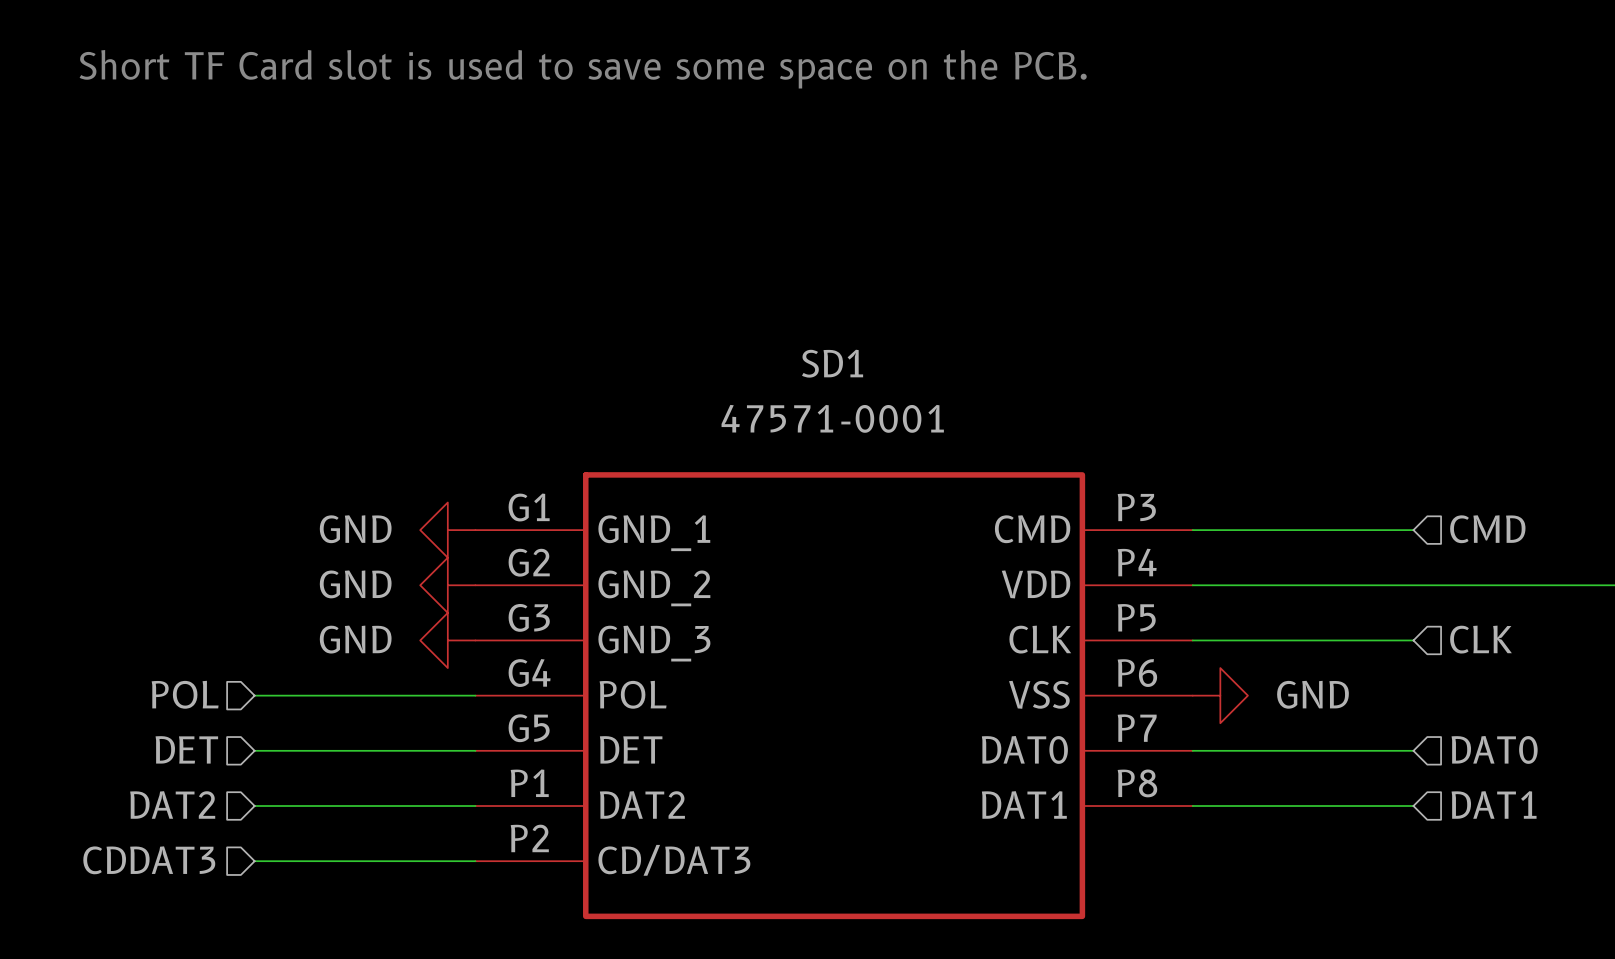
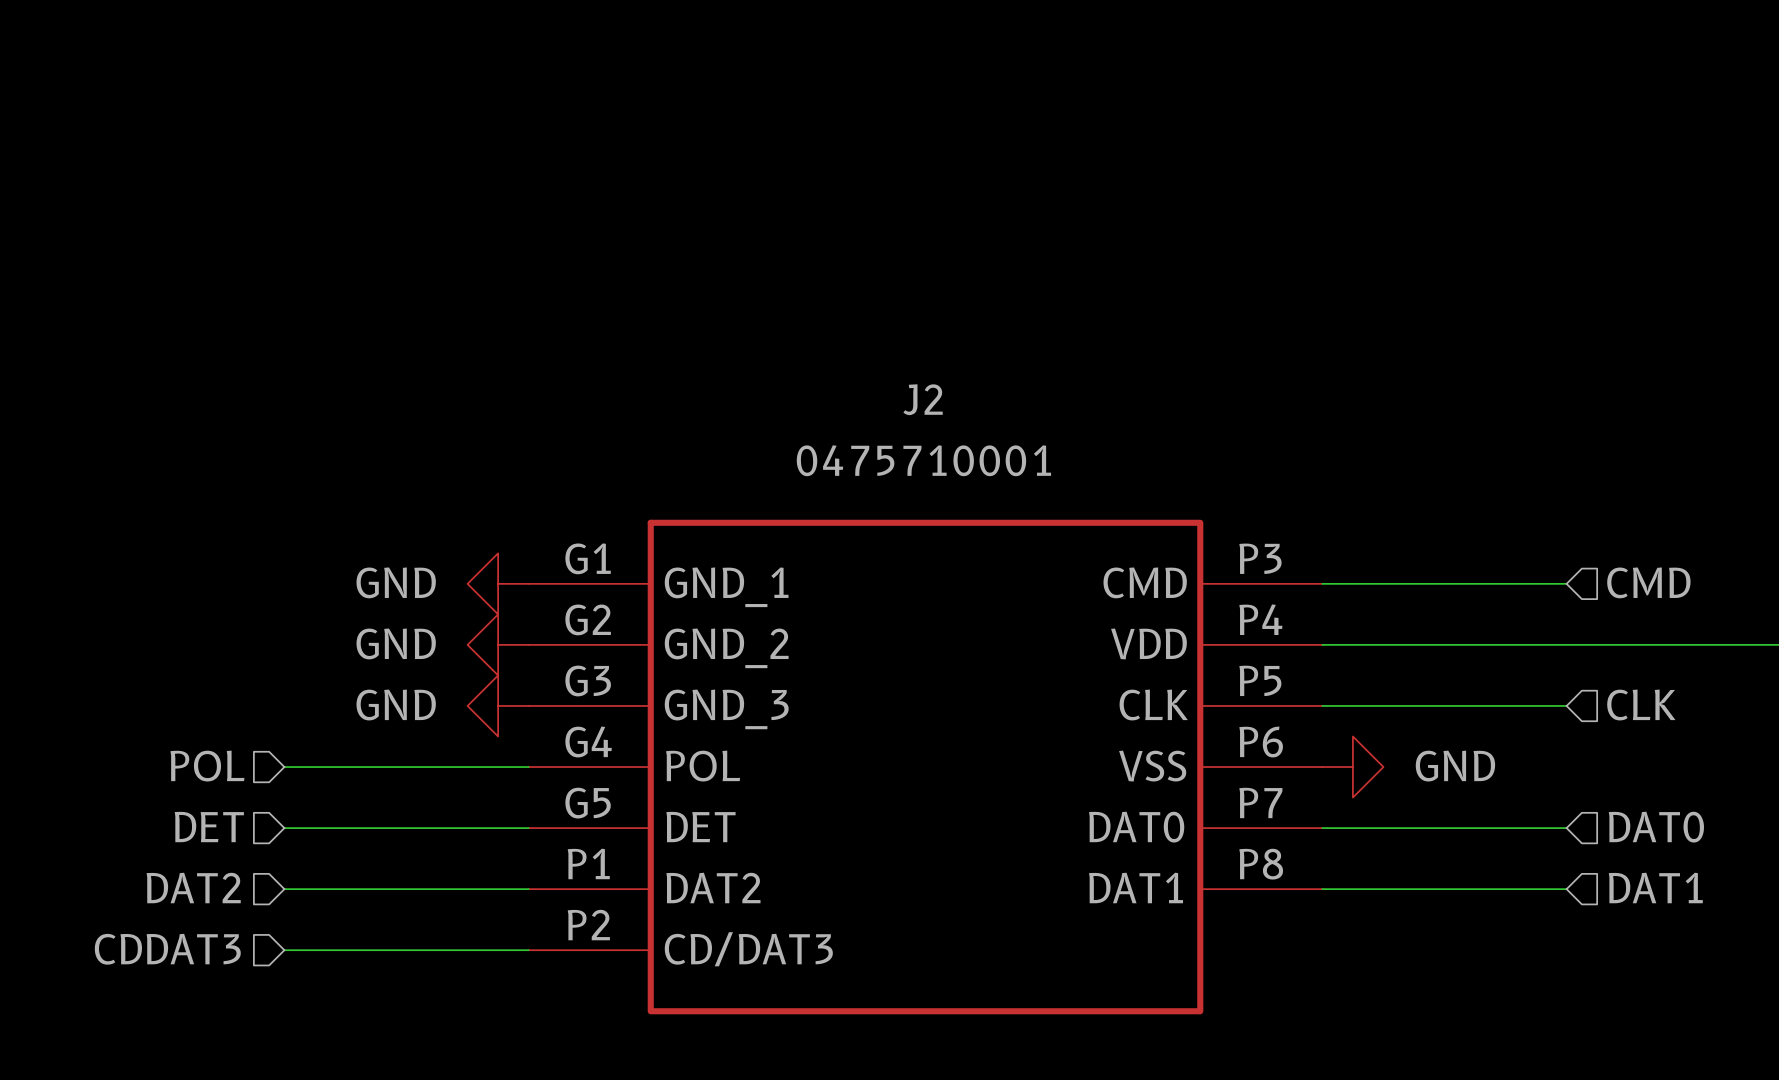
text: Short TF Card slot is used to save some space on the PCB. (583, 69) -> none
SD1 name: SD1 (832, 363) -> J2 (923, 399)
SD1 value: 47571-0001 (832, 418) -> 0475710001 (923, 460)

